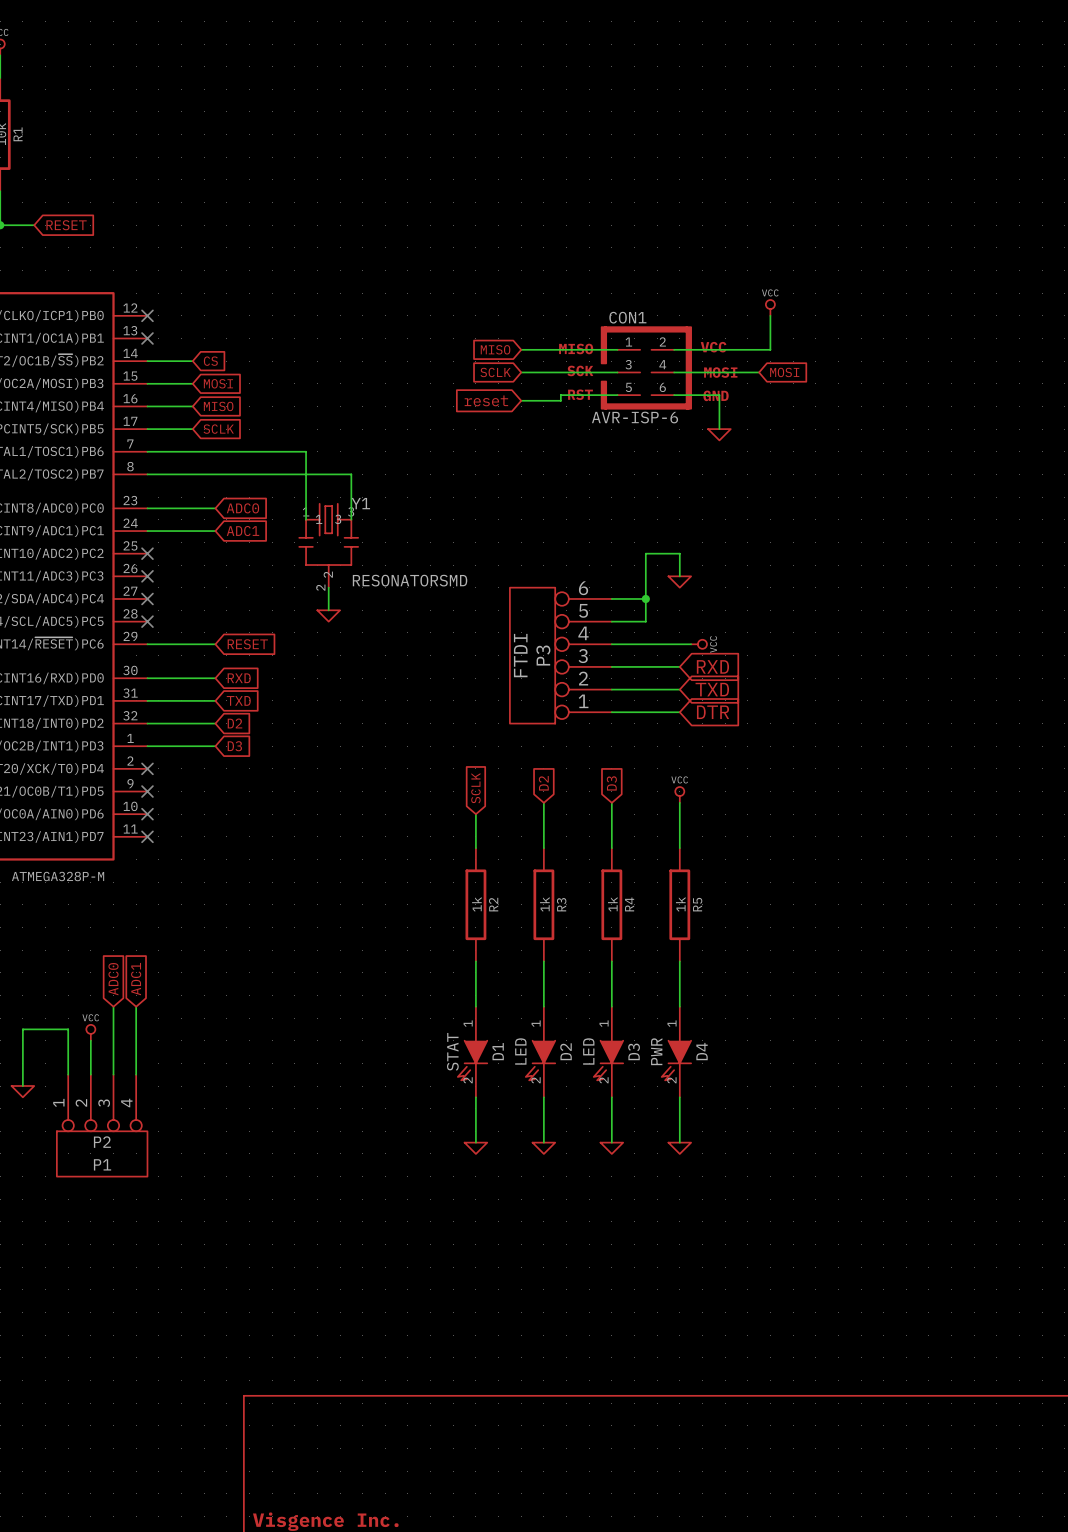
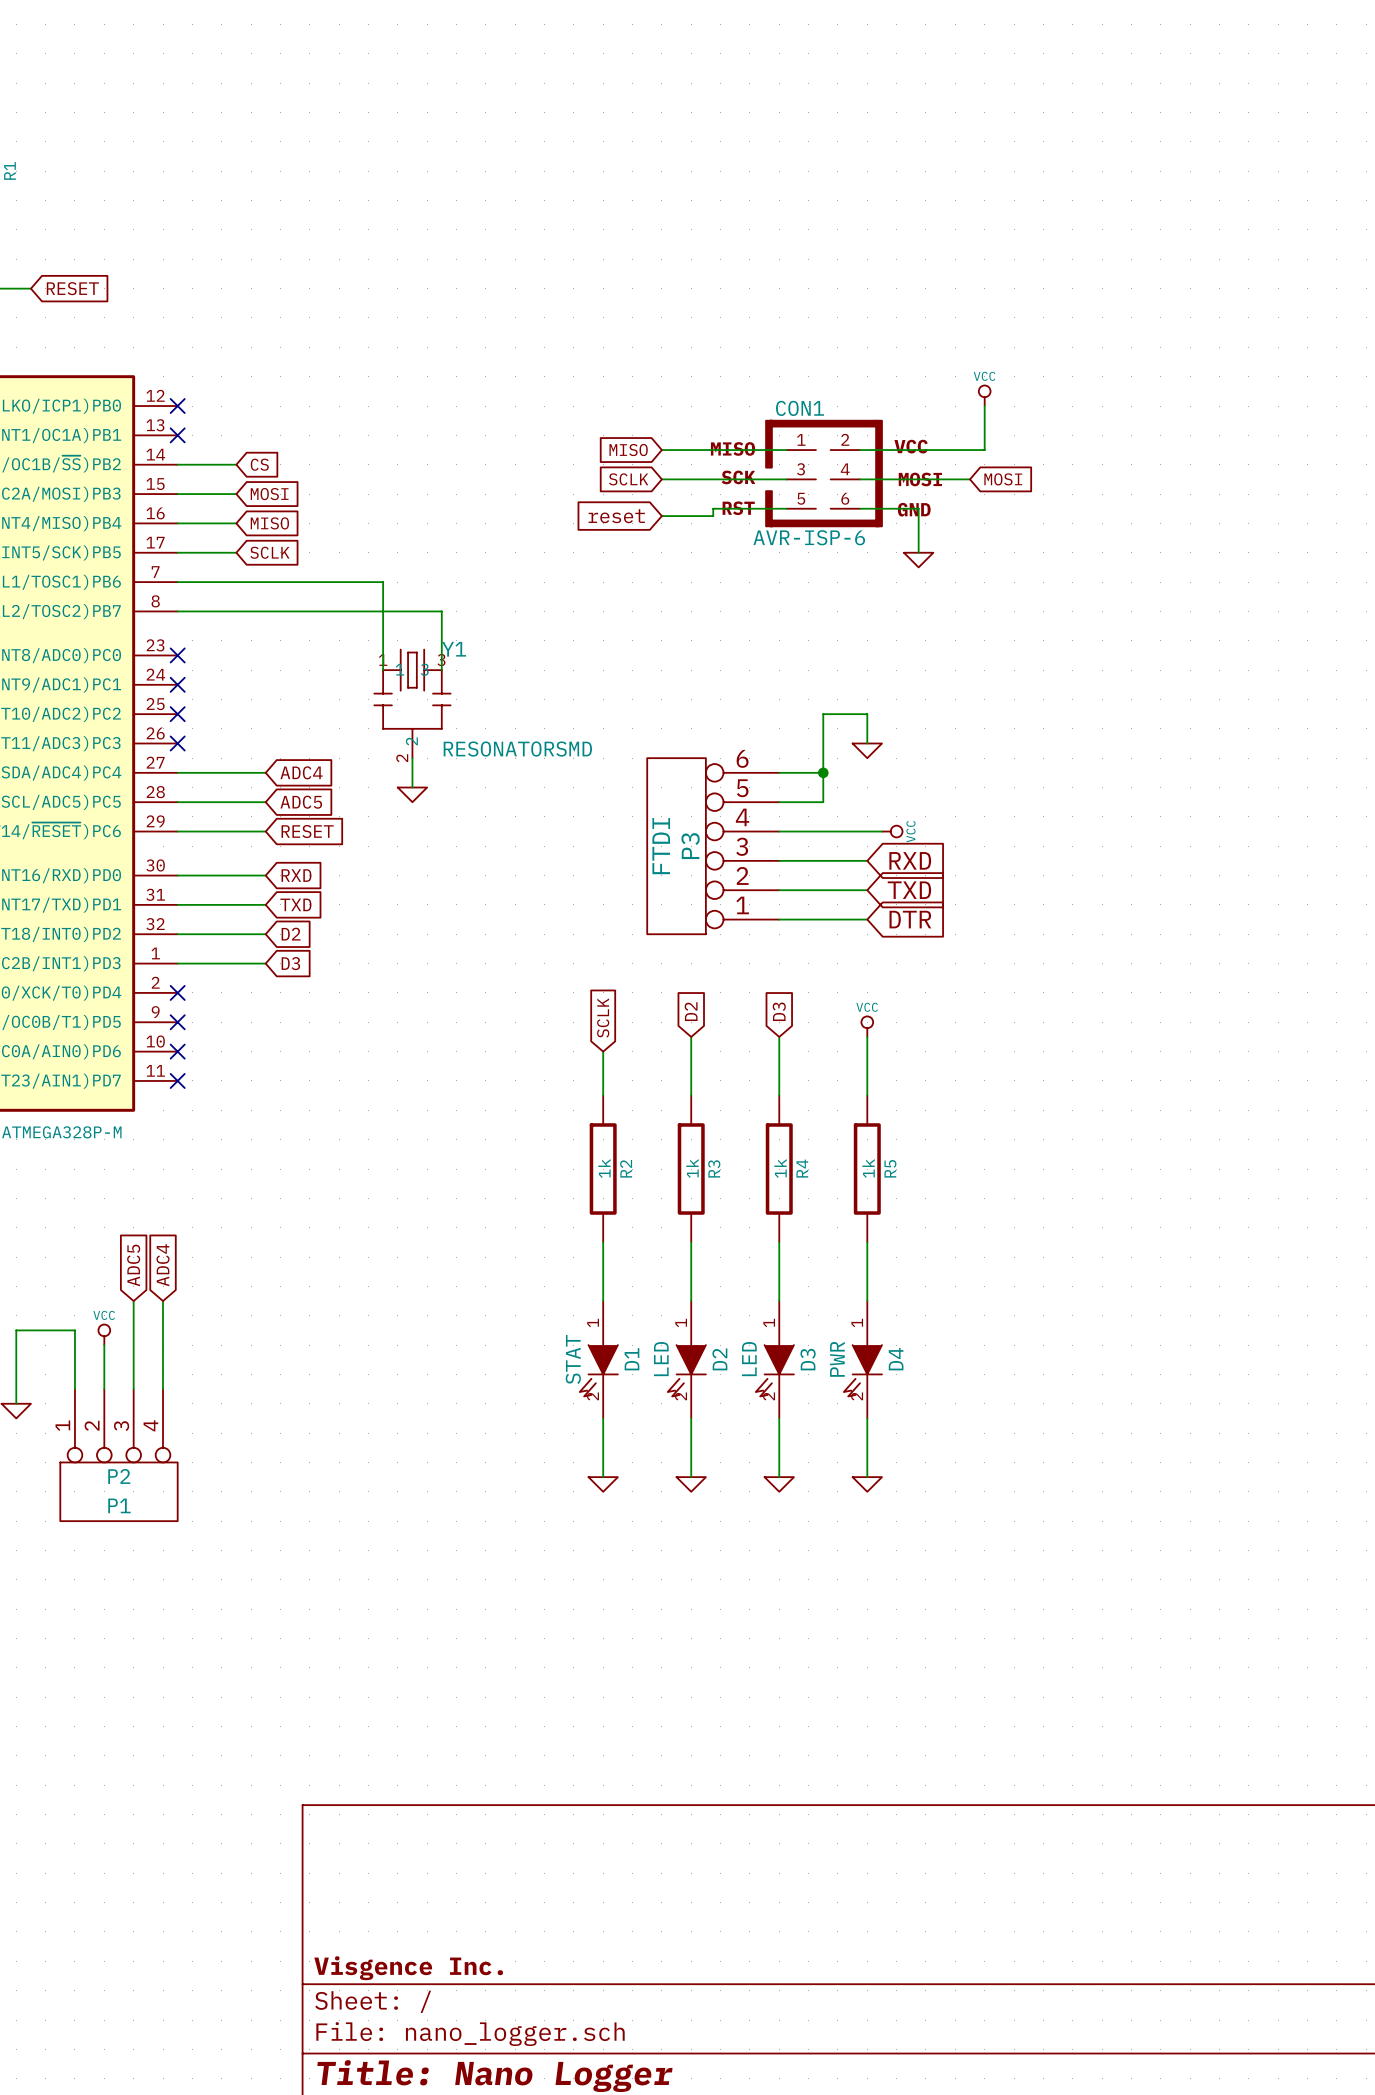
wire: (147, 508) (215, 508) -> (177, 802) (265, 802)
no-connect mark: none -> (177, 655)
global label: ADC0 (242, 508) -> none
wire: (147, 531) (215, 531) -> (177, 772) (265, 772)
no-connect mark: none -> (177, 684)
global label: ADC1 (243, 531) -> none
no-connect mark: (147, 598) -> none
global label: none -> ADC4 (301, 772)
no-connect mark: (147, 621) -> none
global label: none -> ADC5 (301, 802)
global label: ADC0 (113, 979) -> ADC5 (133, 1265)
global label: ADC1 (136, 979) -> ADC4 (163, 1265)

